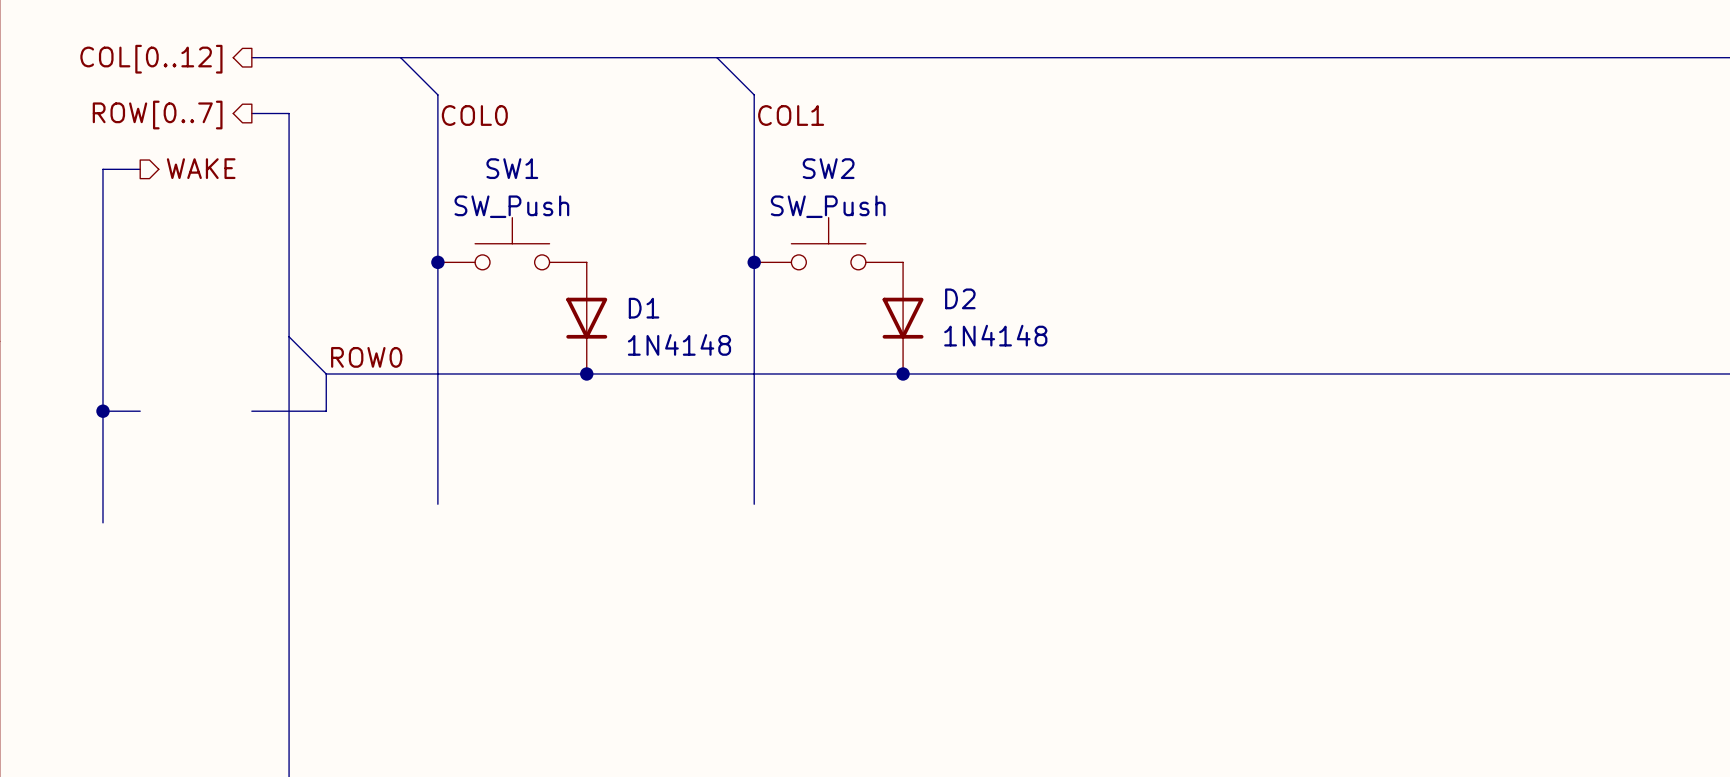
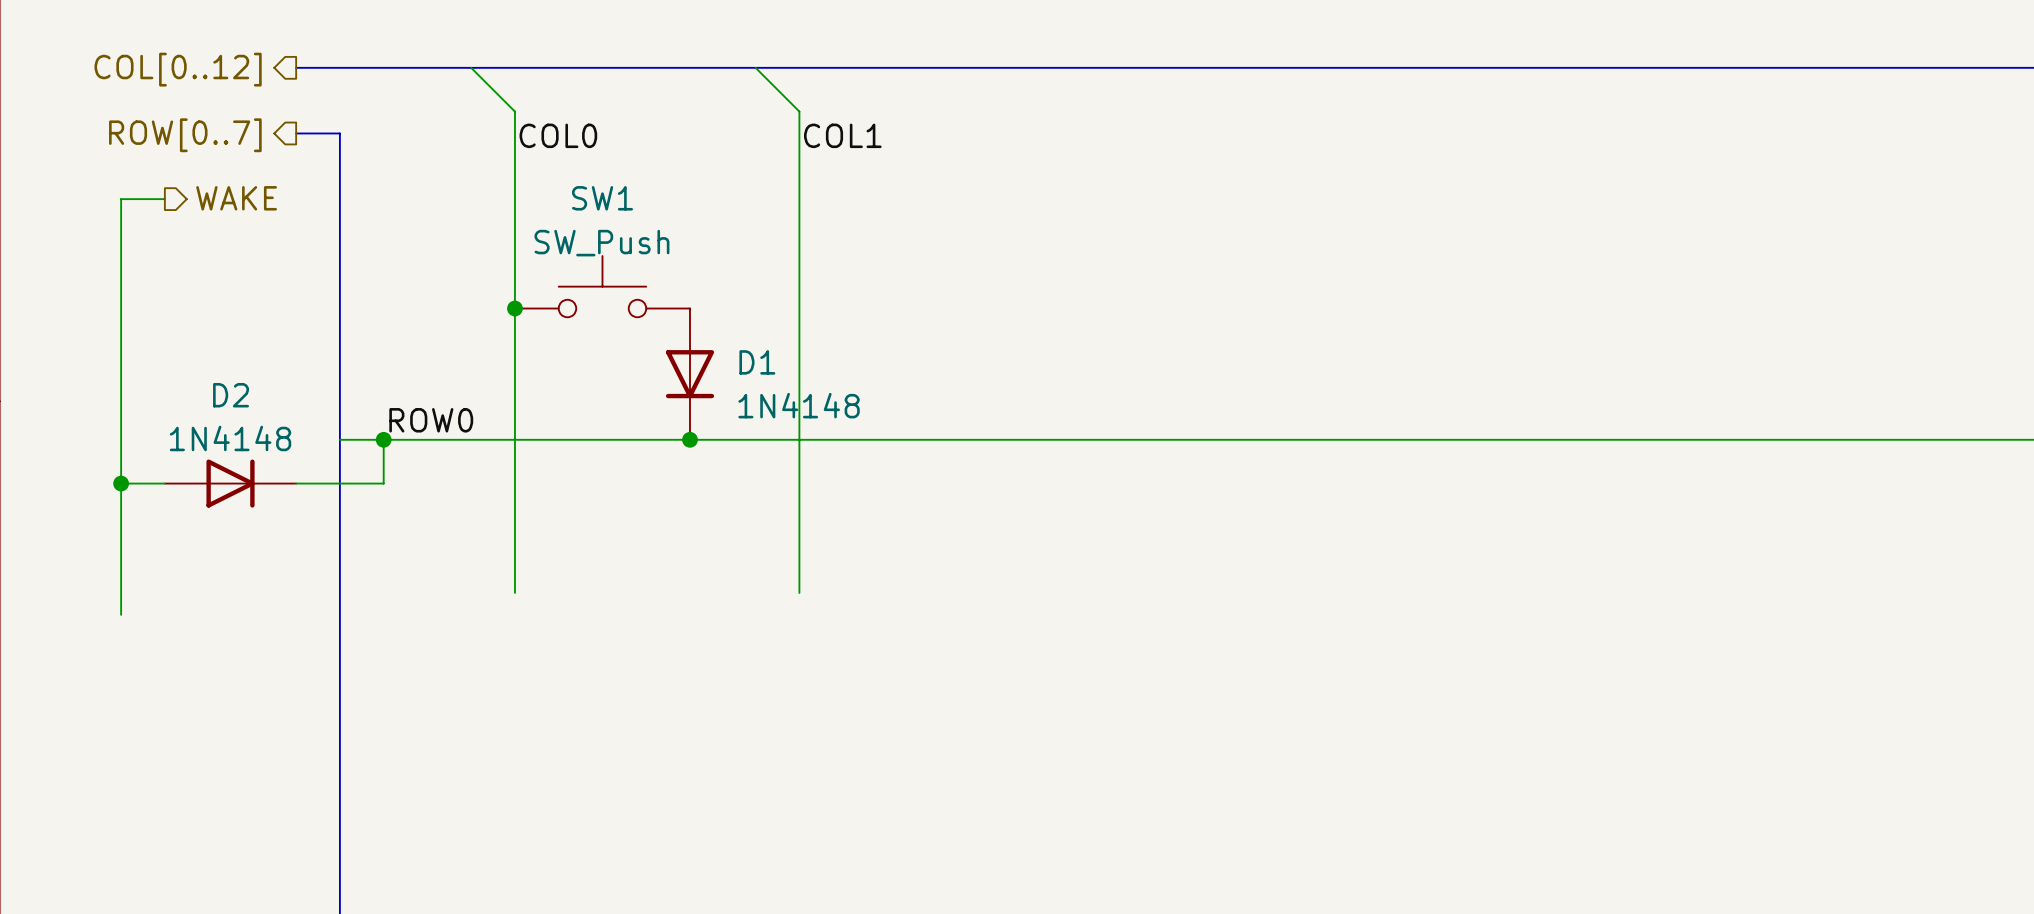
wire: (716, 57) (754, 94) (754, 504) -> (755, 67) (799, 111) (799, 592)
label position: COL1 (791, 115) -> COL1 (842, 135)
SW2: SW_Push (828, 243) -> none
junction: (754, 262) -> none
D2 rotation: 0° (903, 318) -> 90° counterclockwise (230, 483)
D2 position: (903, 318) -> (230, 483)
D2 value position: 1N4148 (995, 335) -> 1N4148 (230, 438)
wire: (289, 336) (326, 373) -> (339, 439) (383, 439)
junction: none -> (383, 439)
junction: (903, 373) -> none

